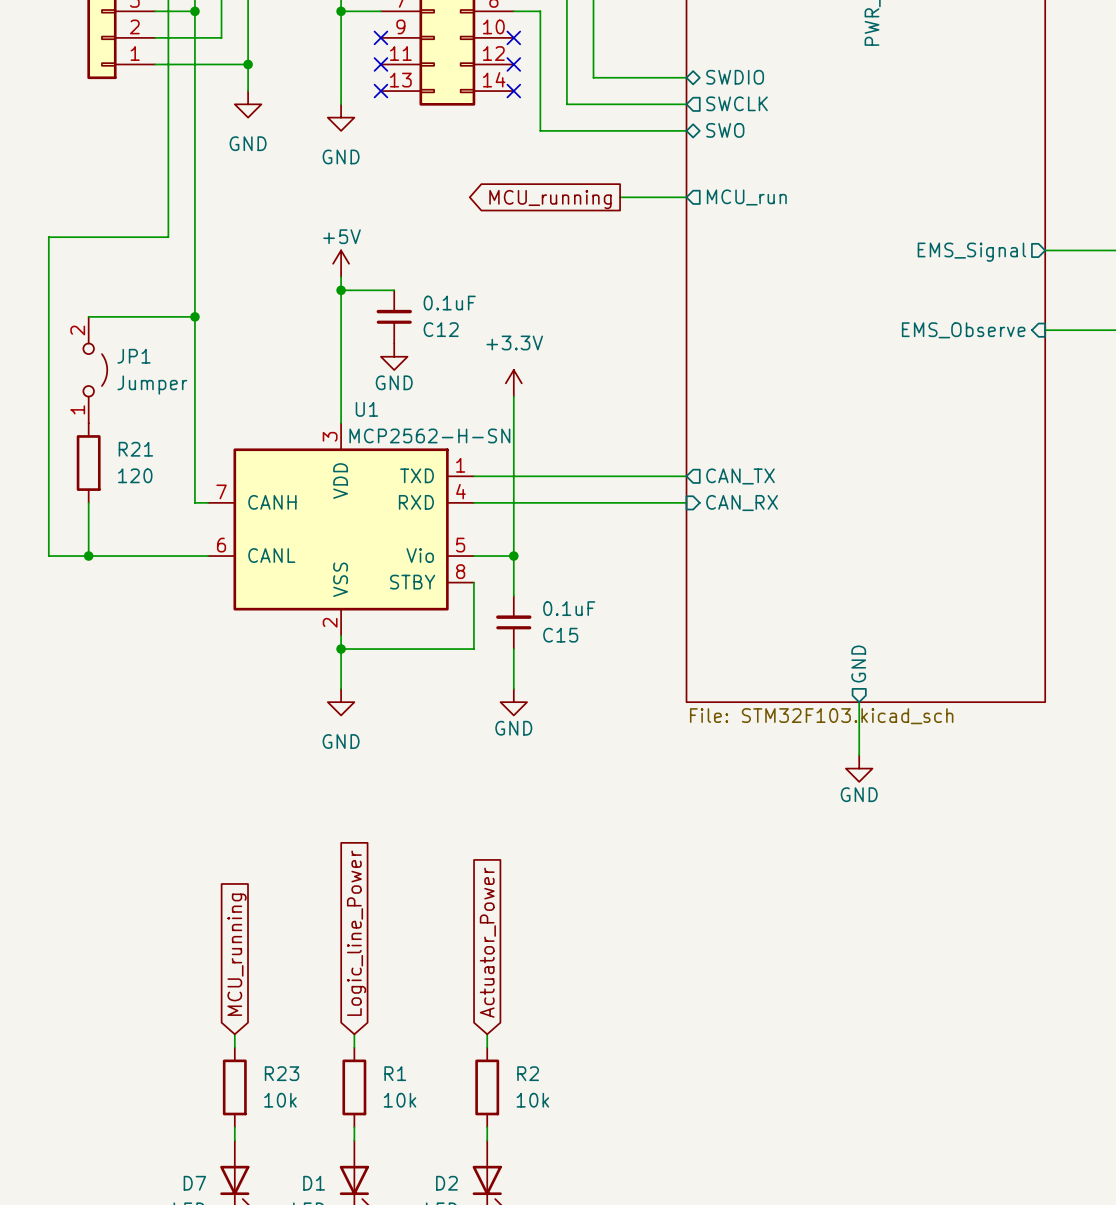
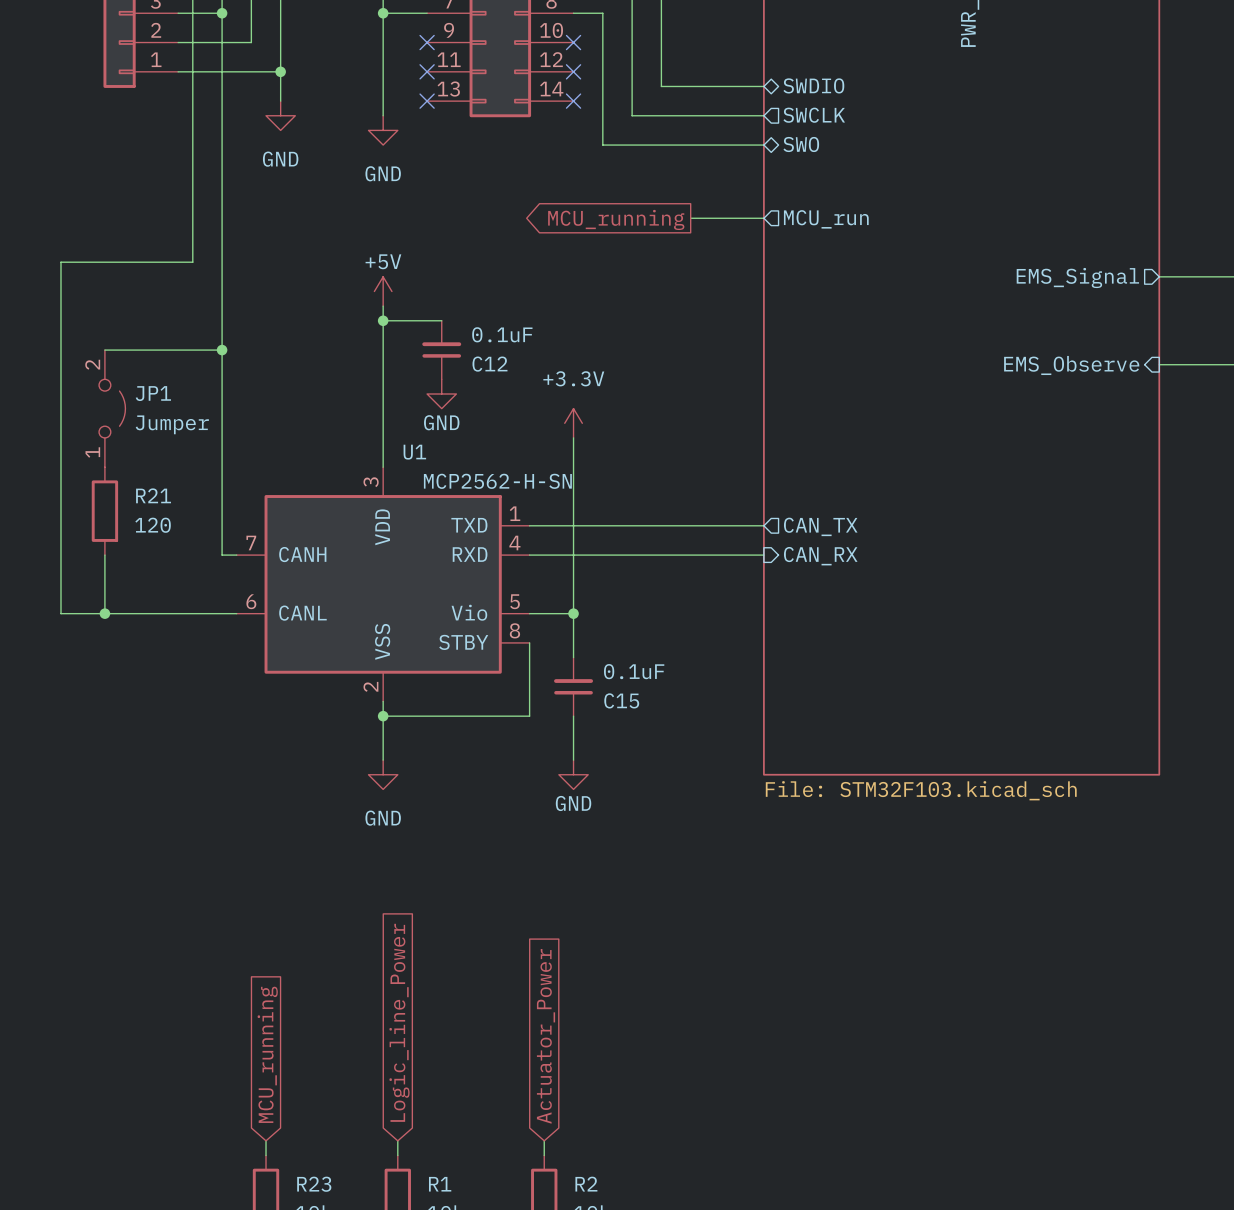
sheet pin: GND (858, 664) -> none
wire: (859, 702) (859, 755) -> none
power symbol: GND (859, 768) -> none

